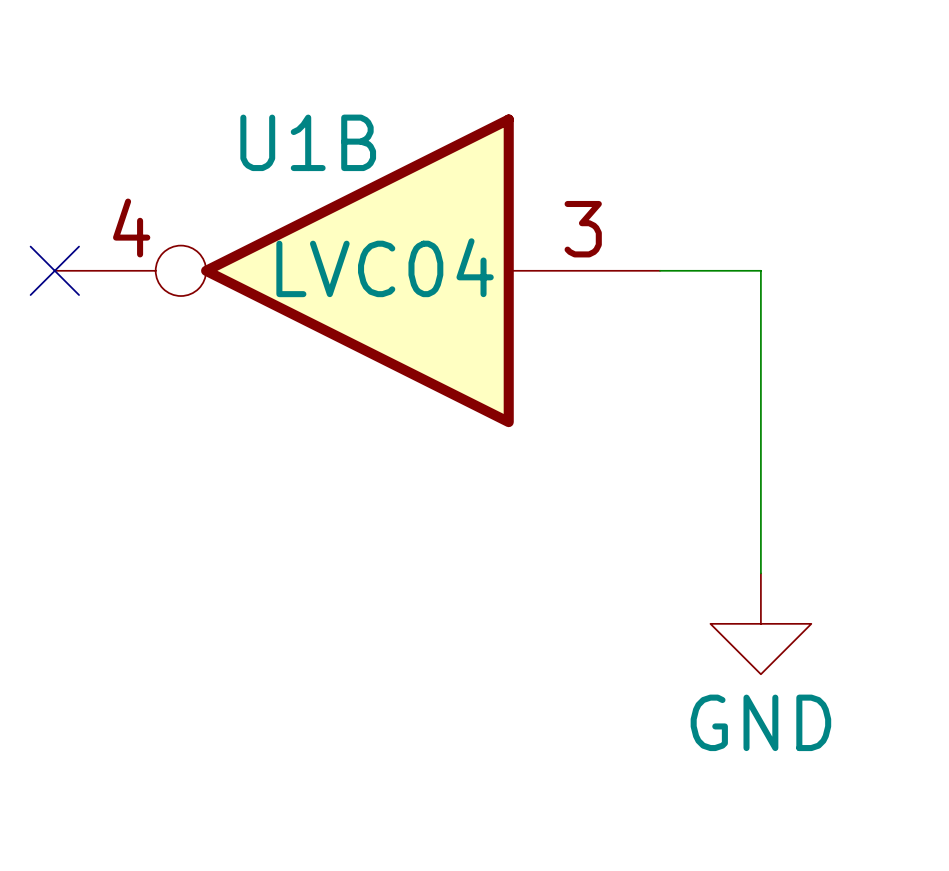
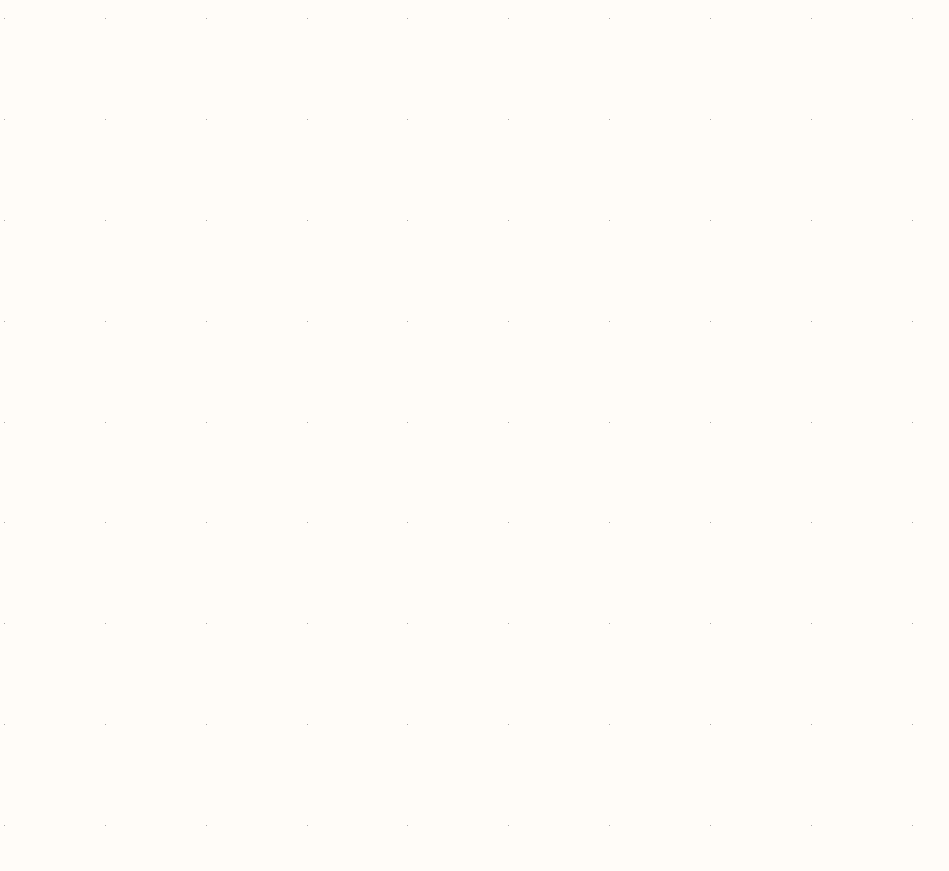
no-connect mark: (54, 270) -> none
U1B: LVC04 (357, 270) -> none
wire: (660, 270) (760, 270) (760, 573) -> none
power symbol: GND (760, 623) -> none

